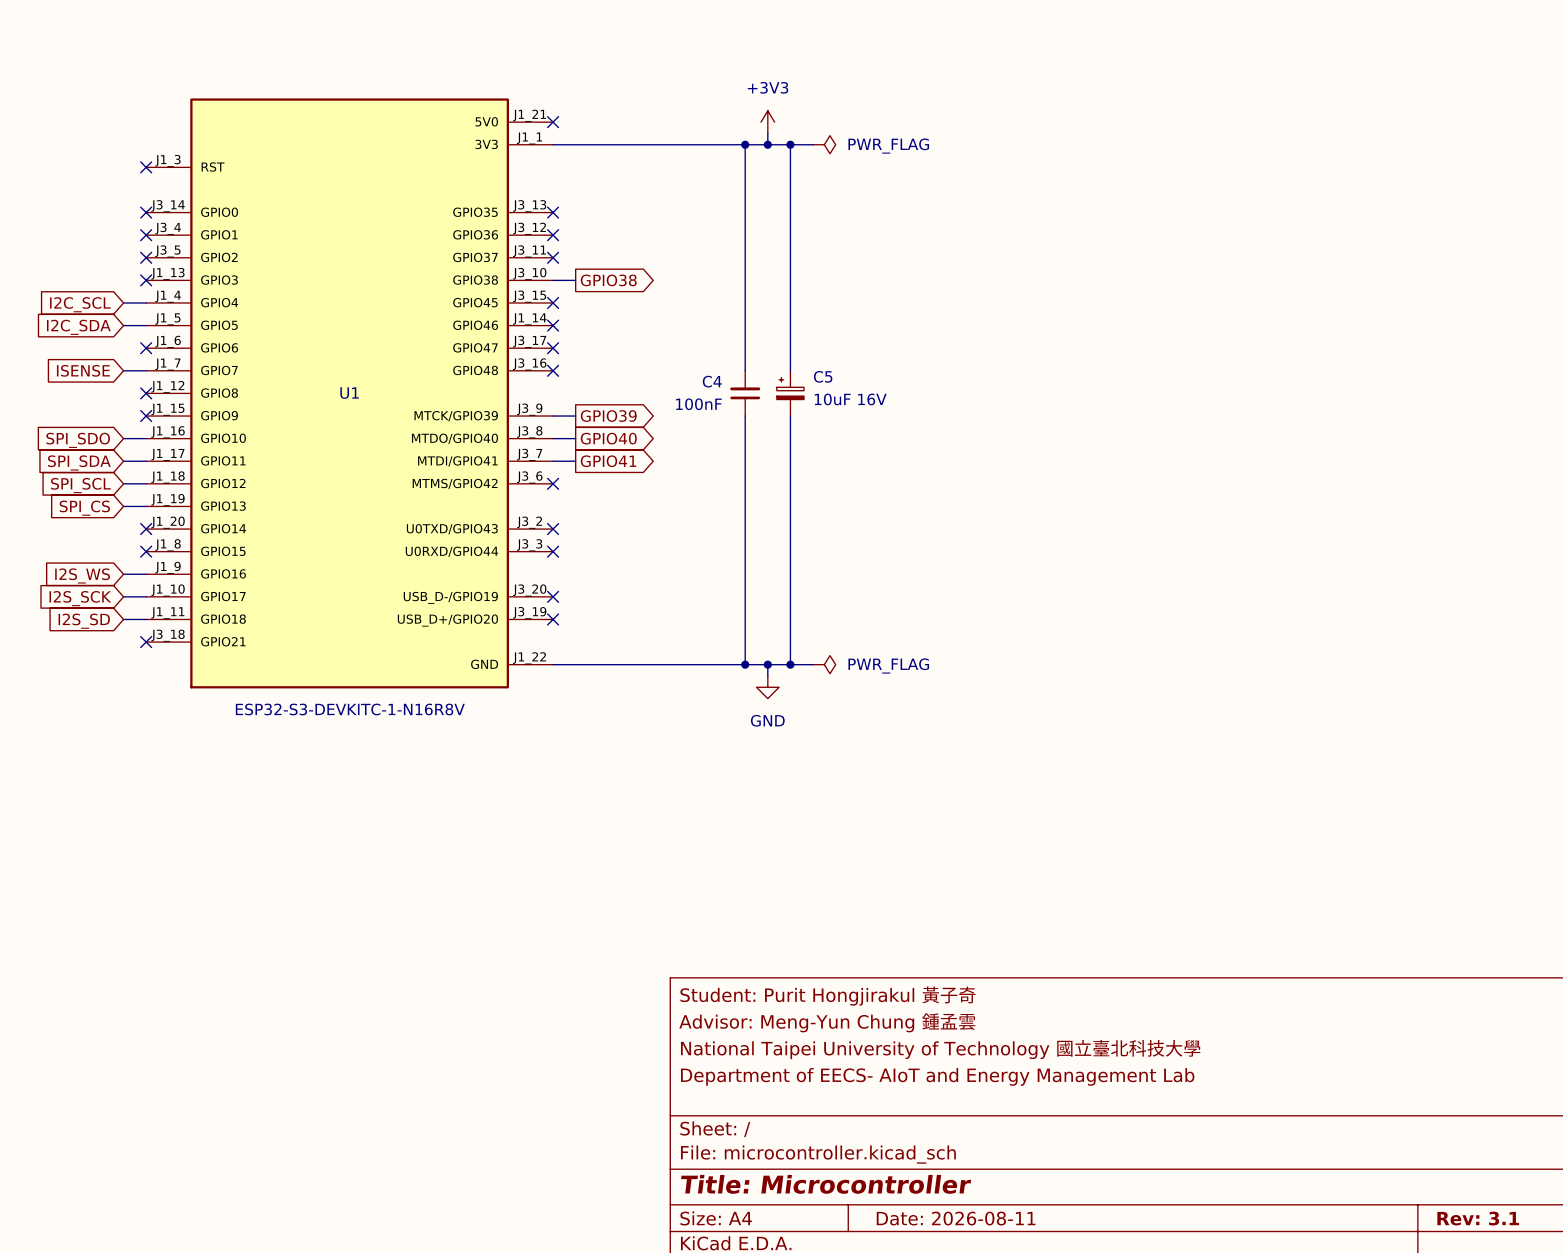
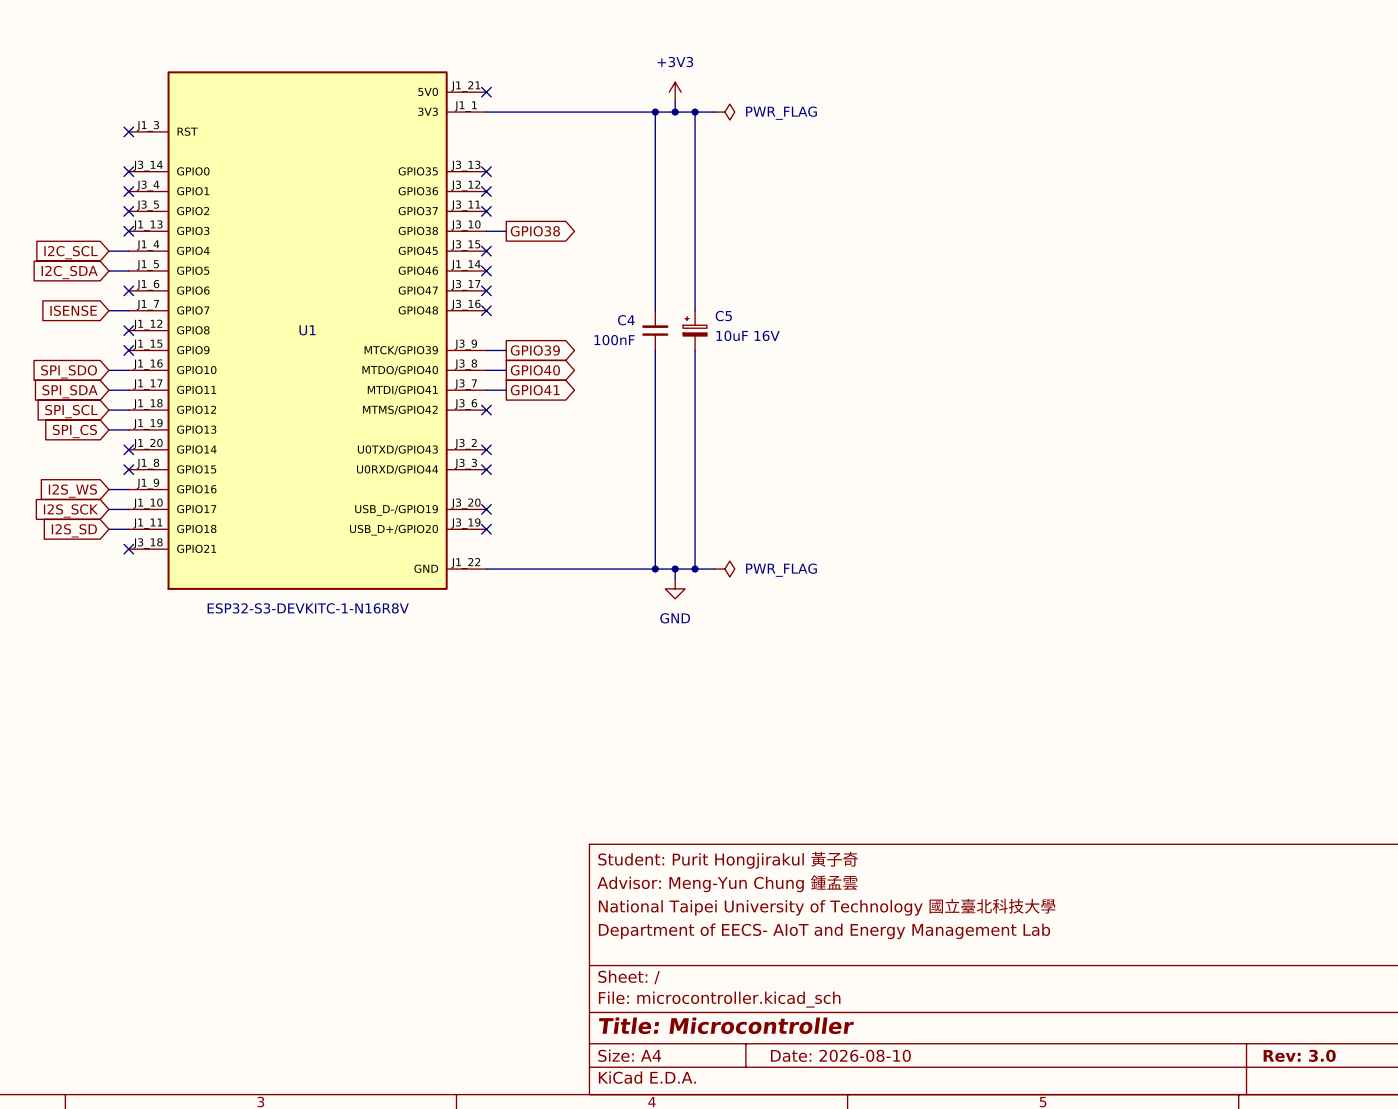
title block: Date: 2026-08-11 (956, 1218) -> Date: 2026-08-10 (840, 1055)
title block: Rev: 3.1 (1478, 1218) -> Rev: 3.0 (1299, 1055)

